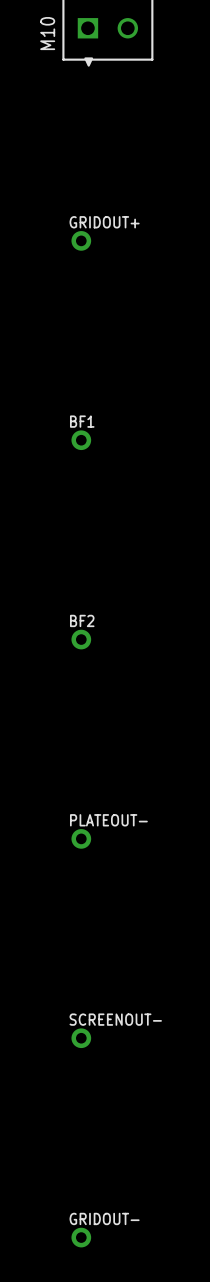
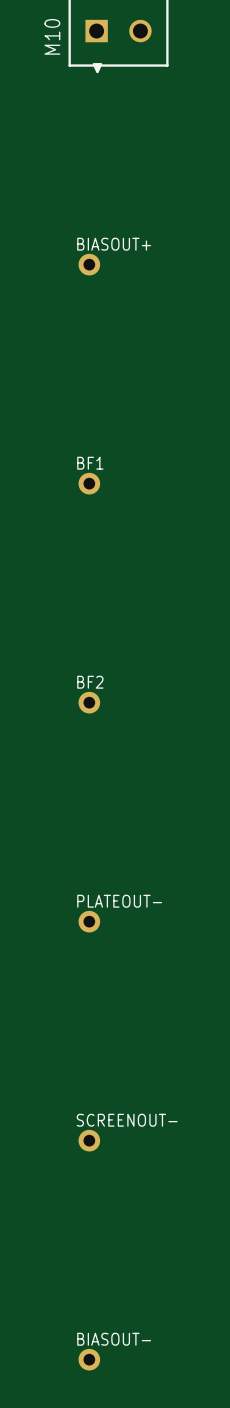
GRIDOUT+ name: GRIDOUT+ (104, 222) -> BIASOUT+ (114, 244)
GRIDOUT- name: GRIDOUT- (104, 1218) -> BIASOUT- (114, 1339)

